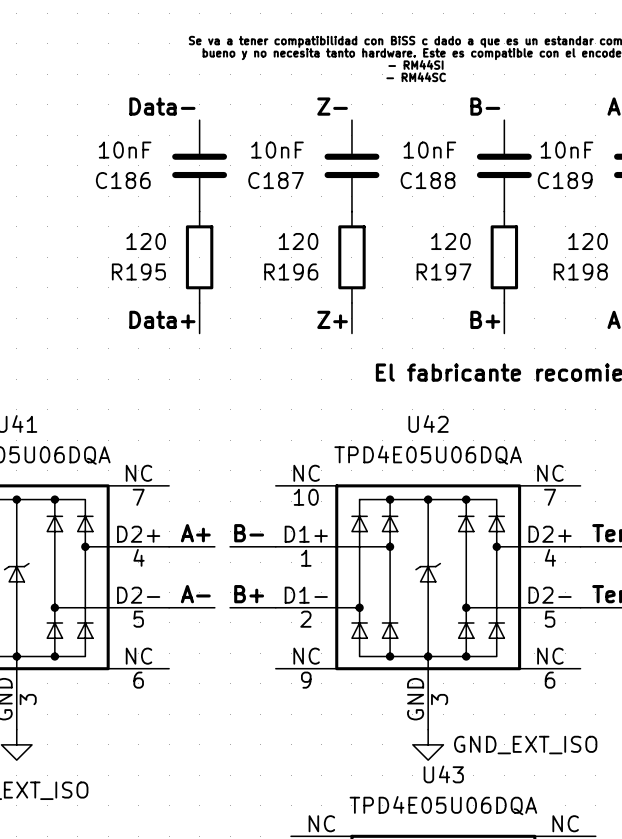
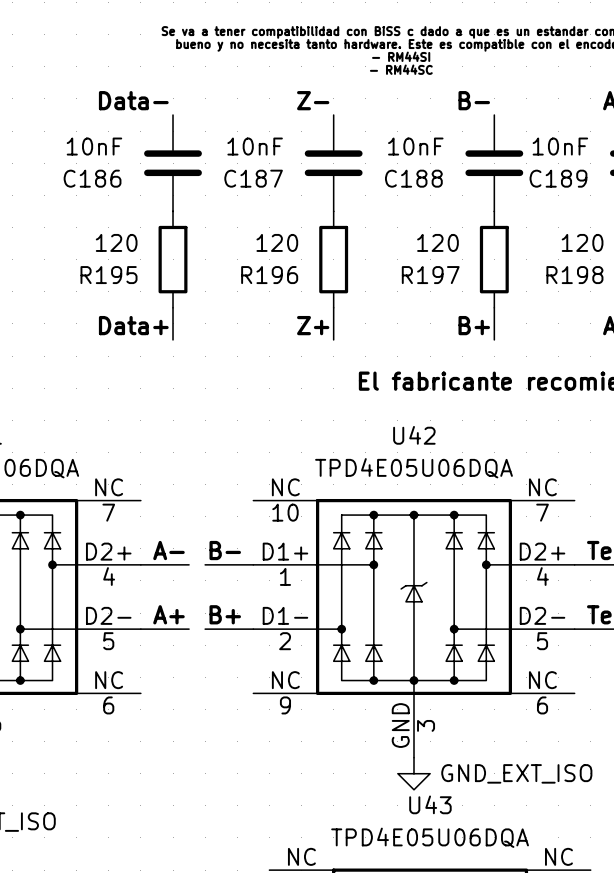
label: A+ (195, 533) -> A- (168, 550)
label: A- (195, 594) -> A+ (168, 614)

